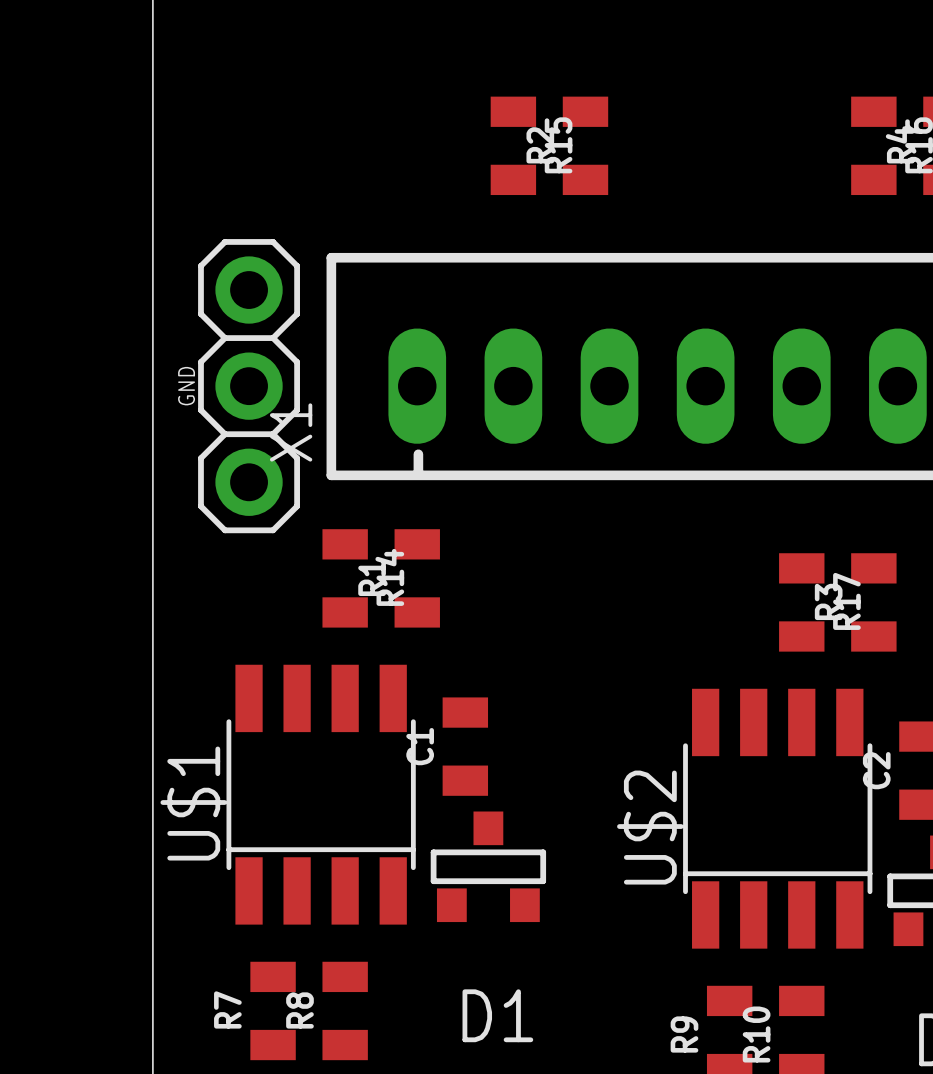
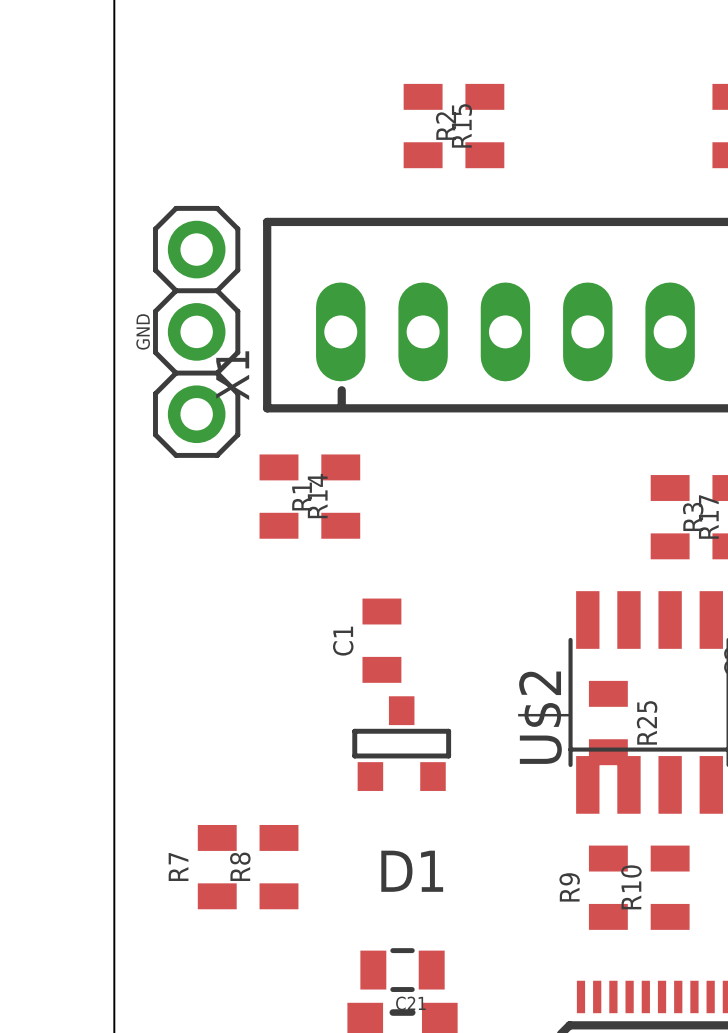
U$1: (321, 794) -> none
R25: none -> (608, 723)

